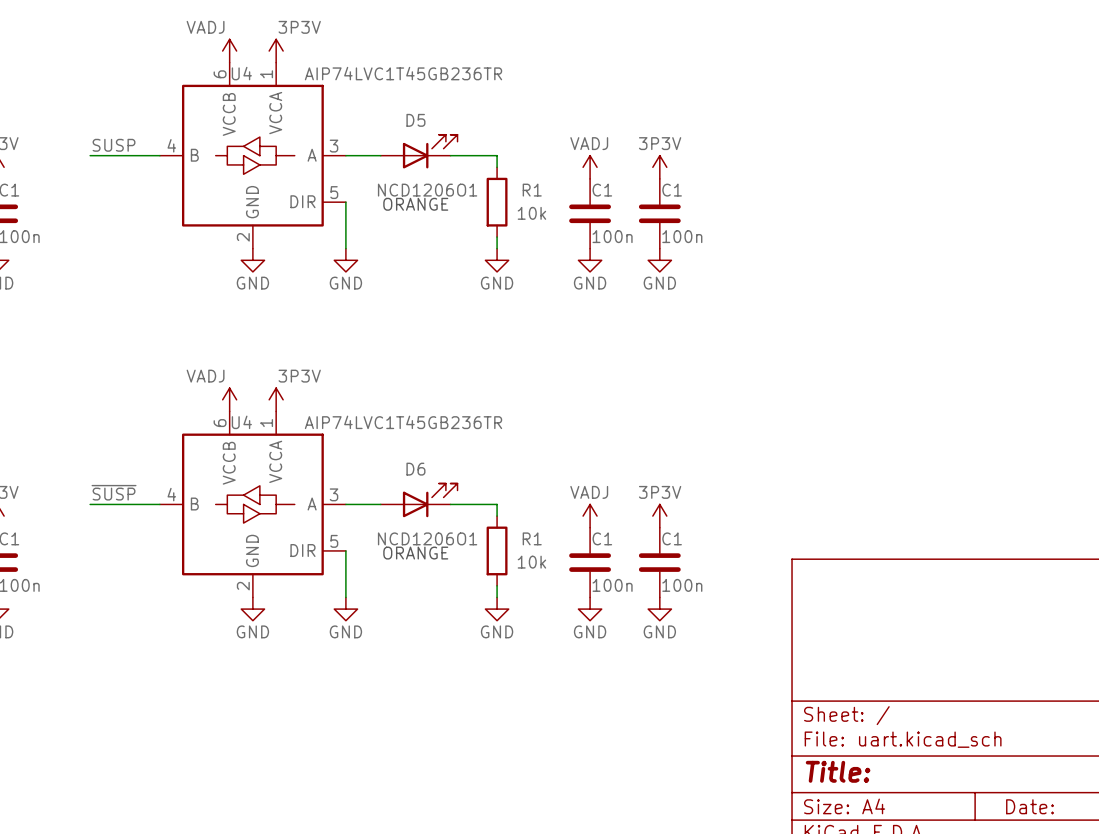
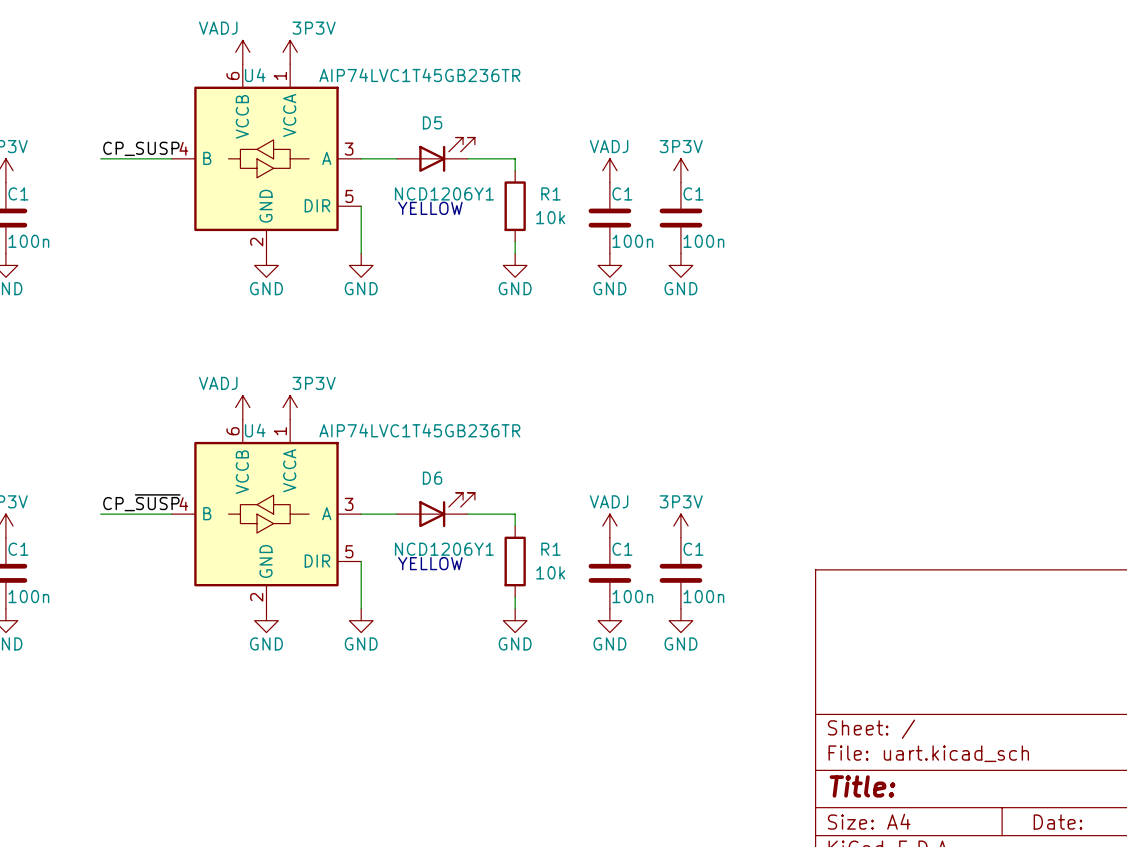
label: SUSP (114, 145) -> CP_SUSP (141, 148)
D5 value: NCD1206O1 (427, 190) -> NCD1206Y1 (444, 193)
text: ORANGE (415, 204) -> YELLOW (430, 208)
label: ~{SUSP} (114, 492) -> CP_~{SUSP} (141, 502)
D6 value: NCD1206O1 (427, 538) -> NCD1206Y1 (444, 549)
text: ORANGE (415, 553) -> YELLOW (430, 563)

